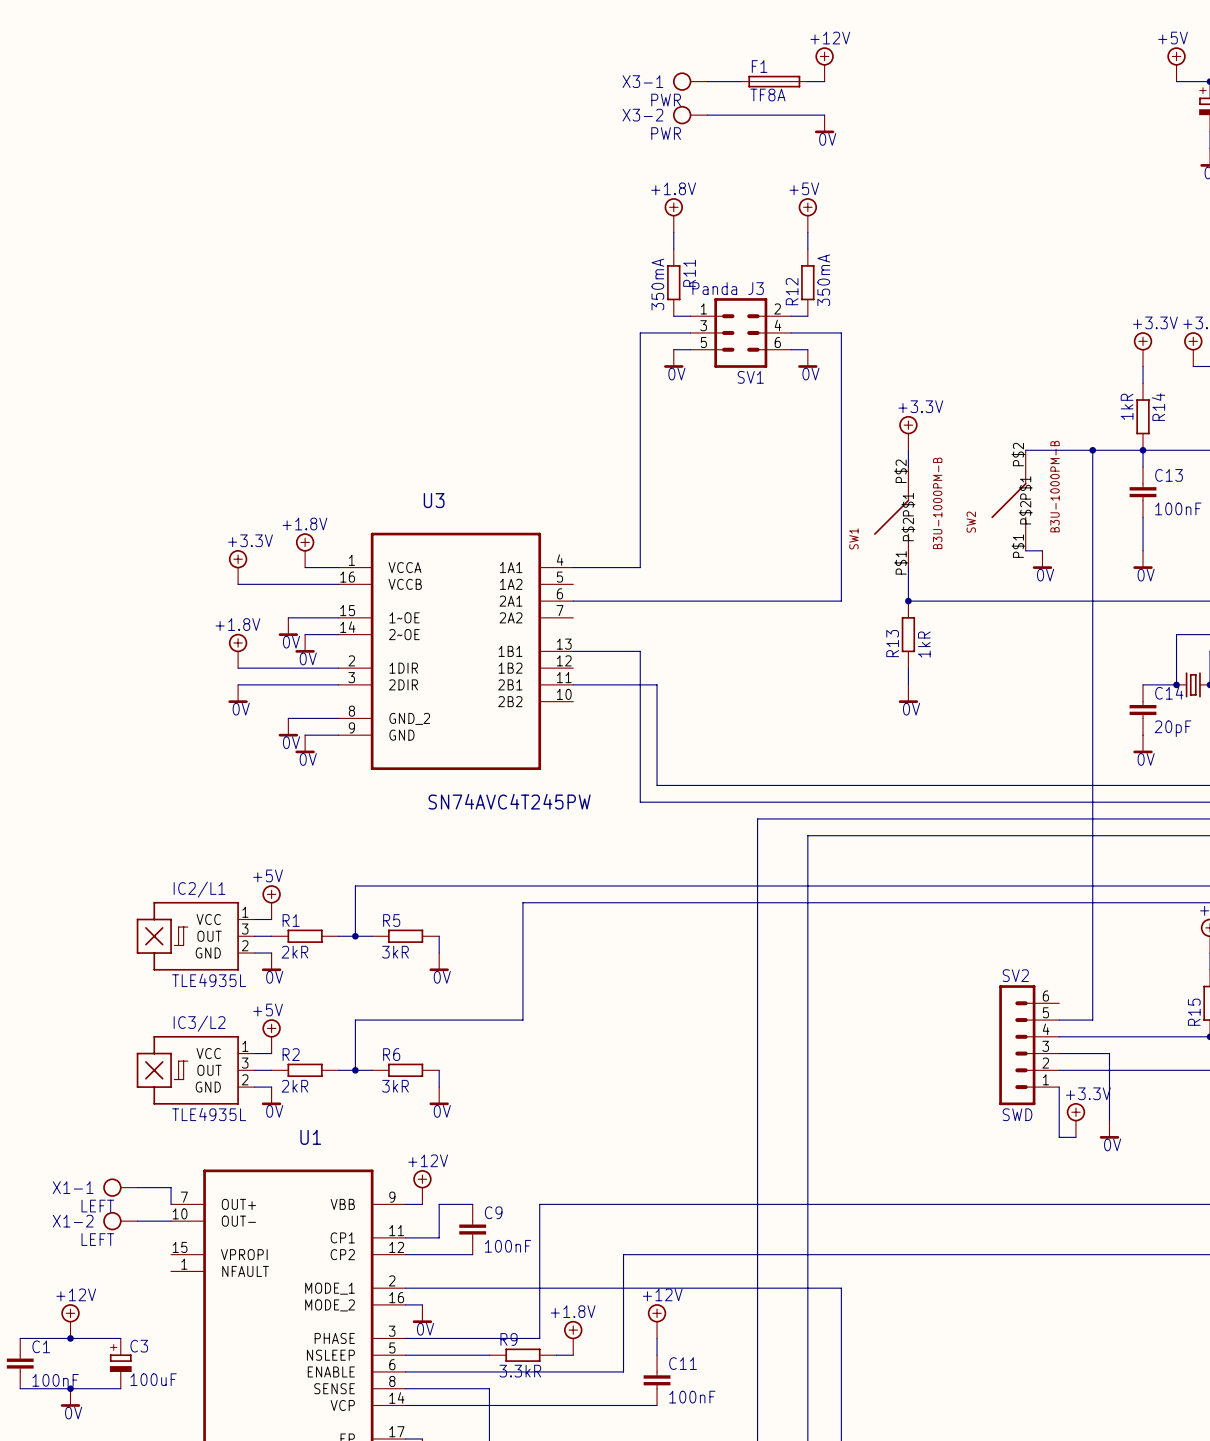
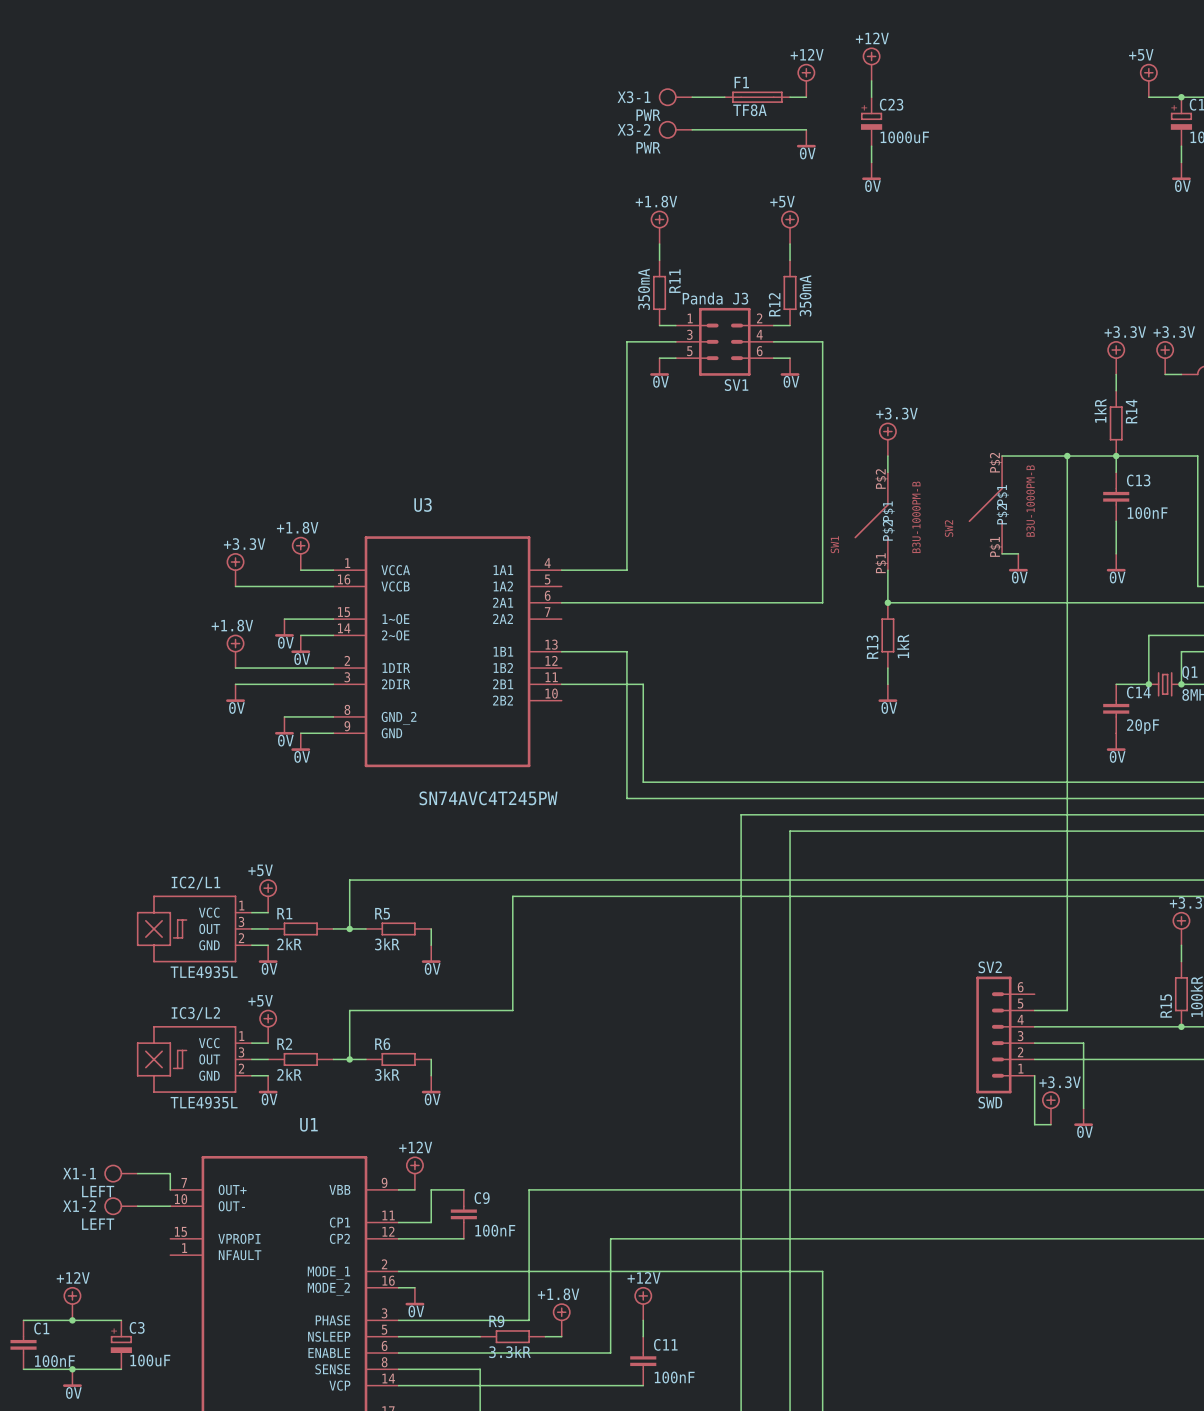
power symbol: none -> +12V (871, 64)
wire: none -> (871, 80) (871, 97)
C23: none -> 1000uF (871, 121)
wire: none -> (871, 146) (871, 162)
power symbol: none -> 0V (871, 171)

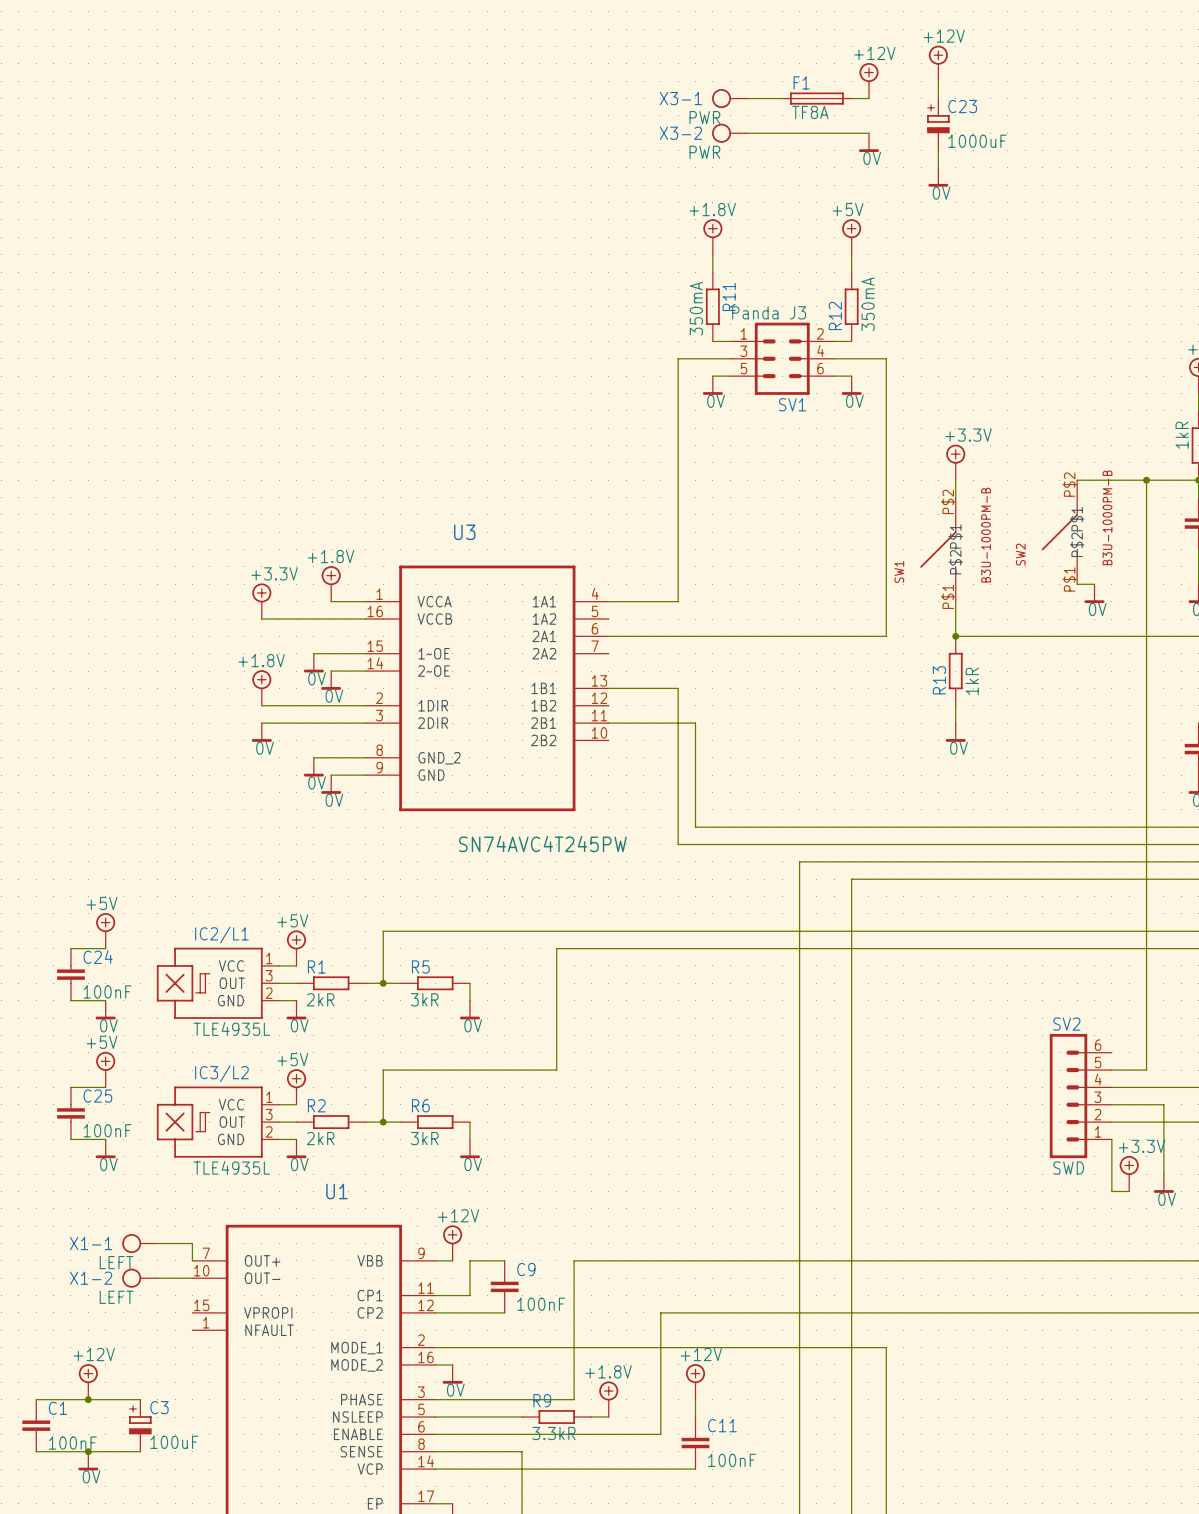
power symbol: none -> +5V (105, 930)
wire: none -> (70, 948) (105, 948)
C24: none -> 100nF (70, 974)
wire: none -> (70, 1000) (105, 1000)
power symbol: none -> 0V (105, 1010)
power symbol: none -> +5V (105, 1069)
wire: none -> (70, 1087) (105, 1087)
C25: none -> 100nF (70, 1113)
wire: none -> (70, 1139) (105, 1139)
power symbol: none -> 0V (105, 1148)

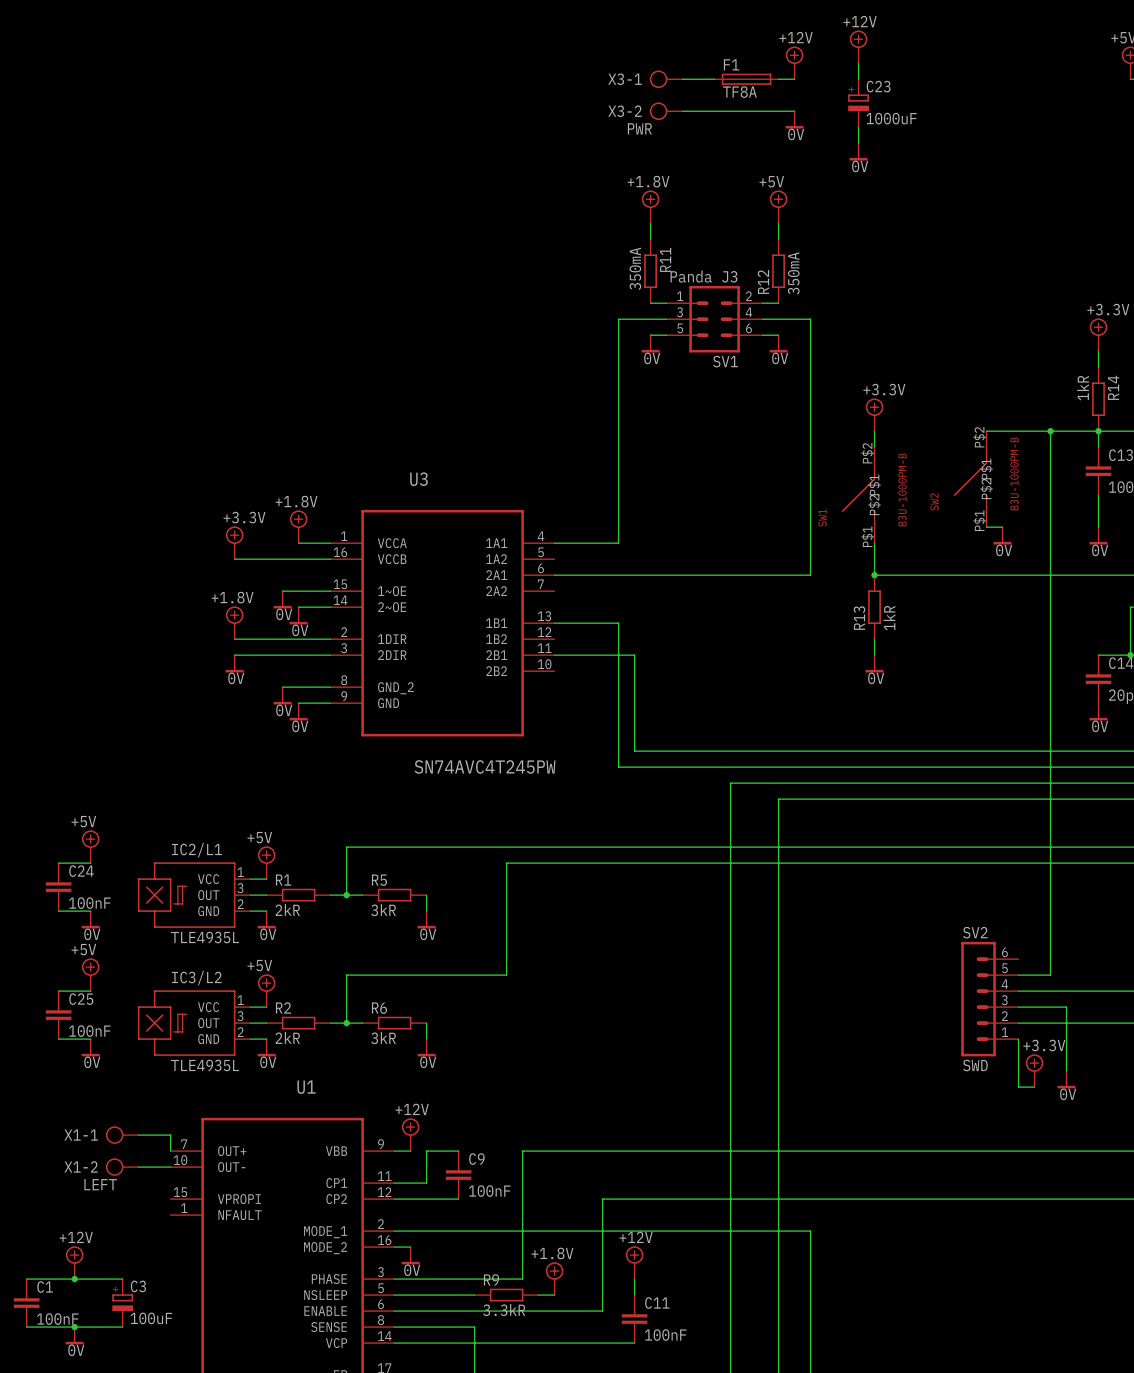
X3-1 value: PWR (704, 117) -> none
X1-1 value: LEFT (116, 1262) -> none

